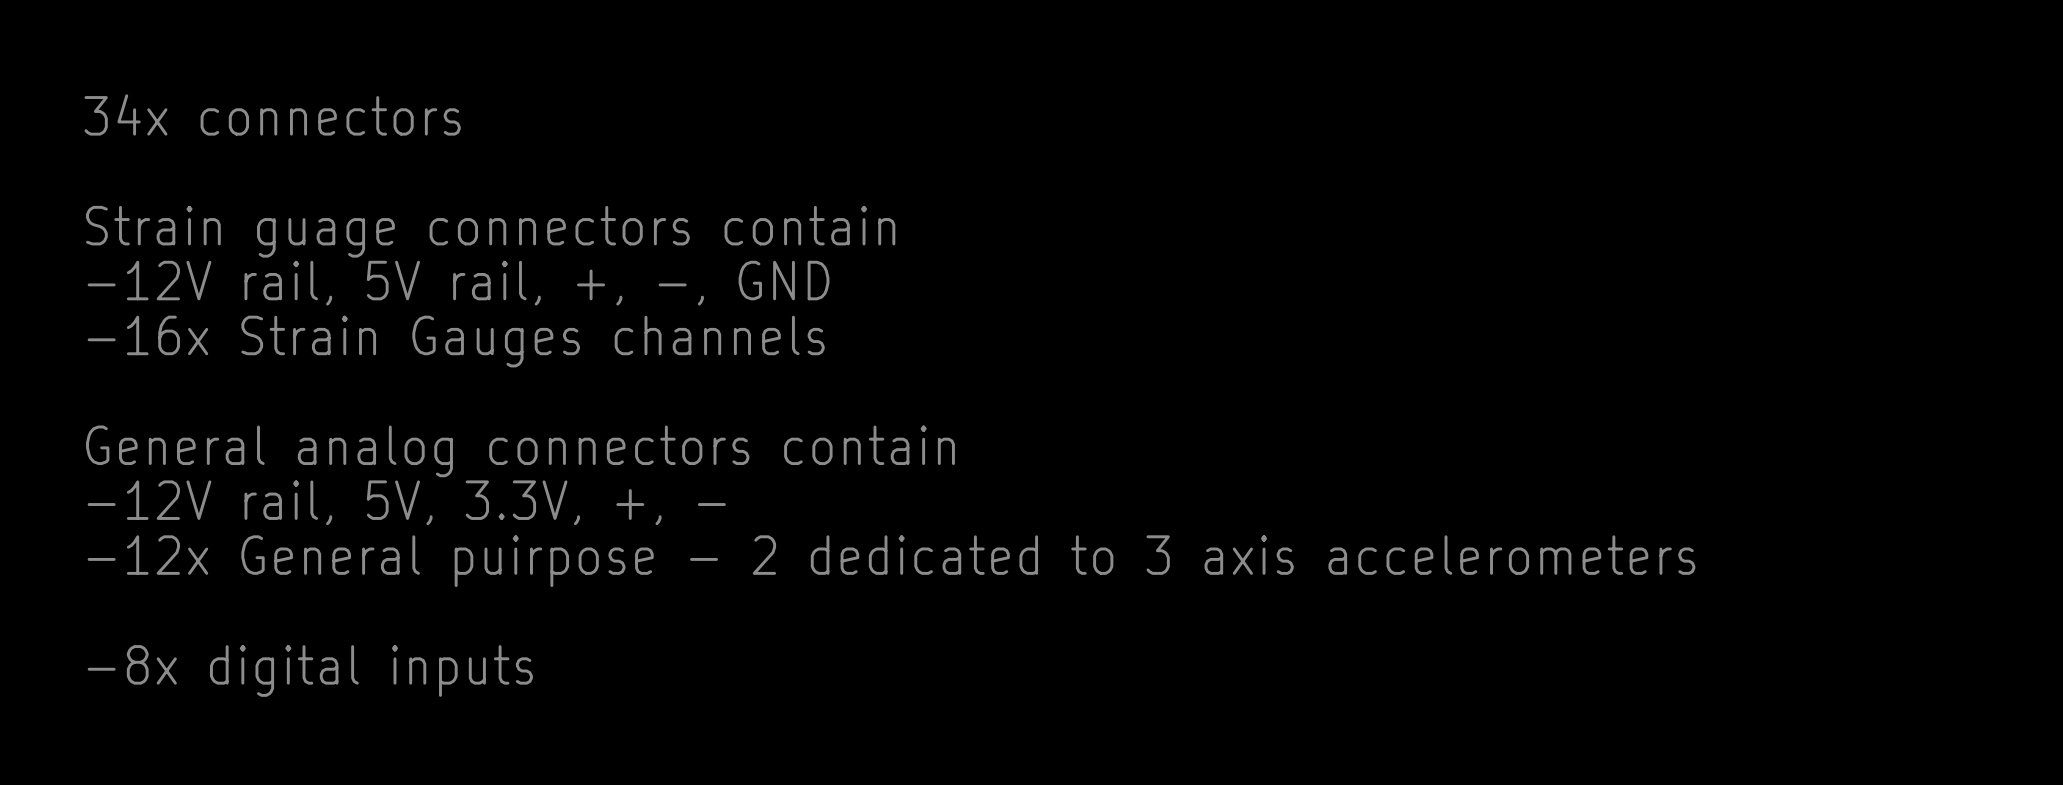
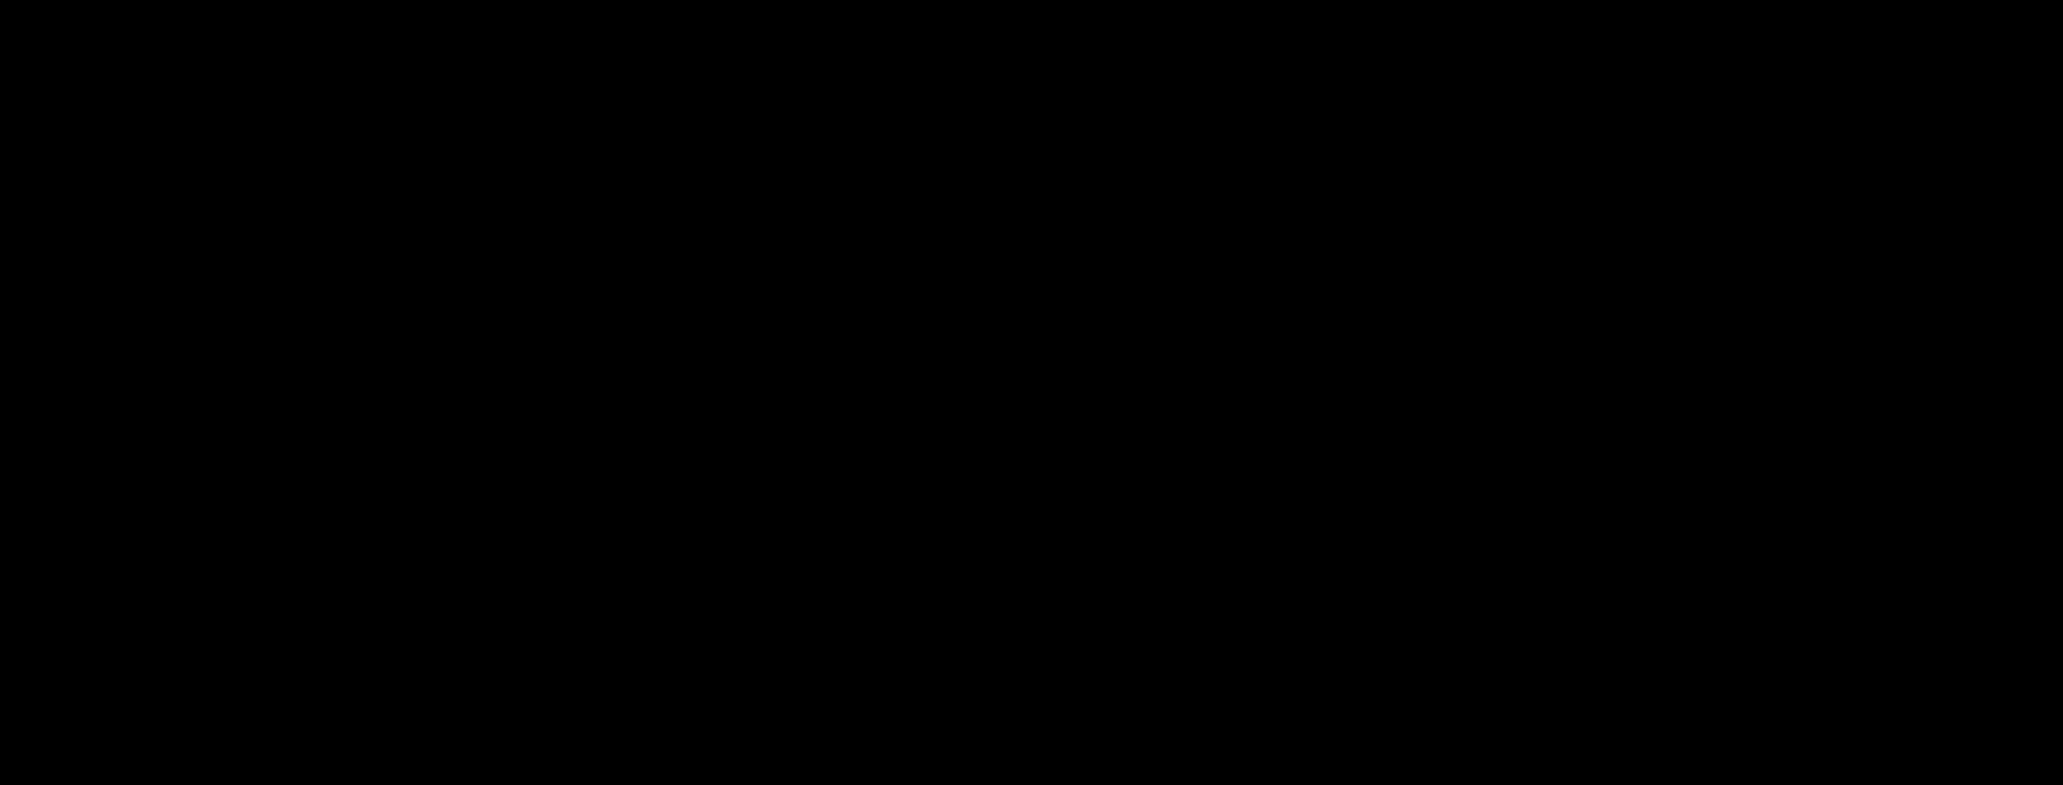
text: 34x connectors (272, 114) -> none
text: Strain guage connectors contain (490, 231) -> none
text: -12V rail, 5V rail, +, -, GND (458, 283) -> none
text: -16x Strain Gauges channels (456, 341) -> none
text: General analog connectors contain (520, 451) -> none
text: -12V rail, 5V, 3.3V, +, - (406, 502) -> none
text: -12x General puirpose - 2 dedicated to 3 axis accelerometers (891, 561) -> none
text: -8x digital inputs (310, 670) -> none

